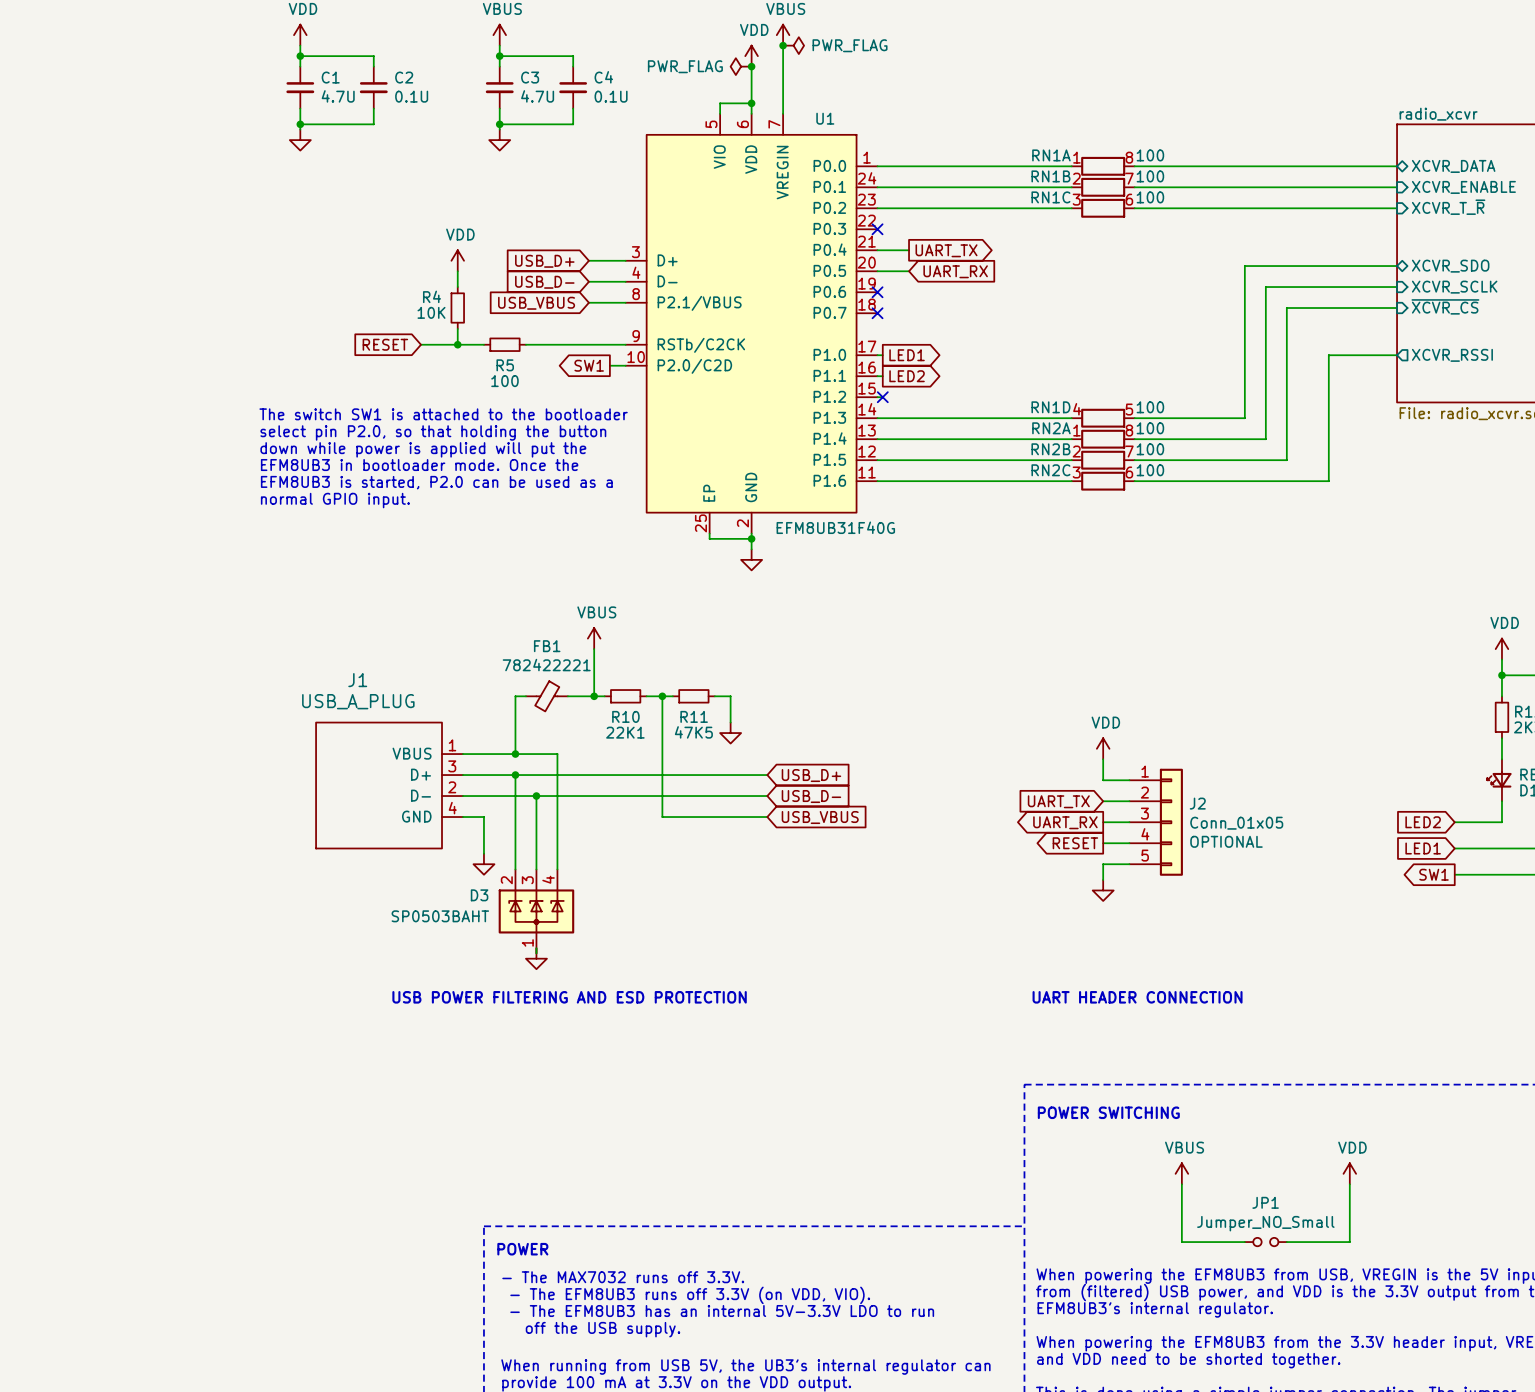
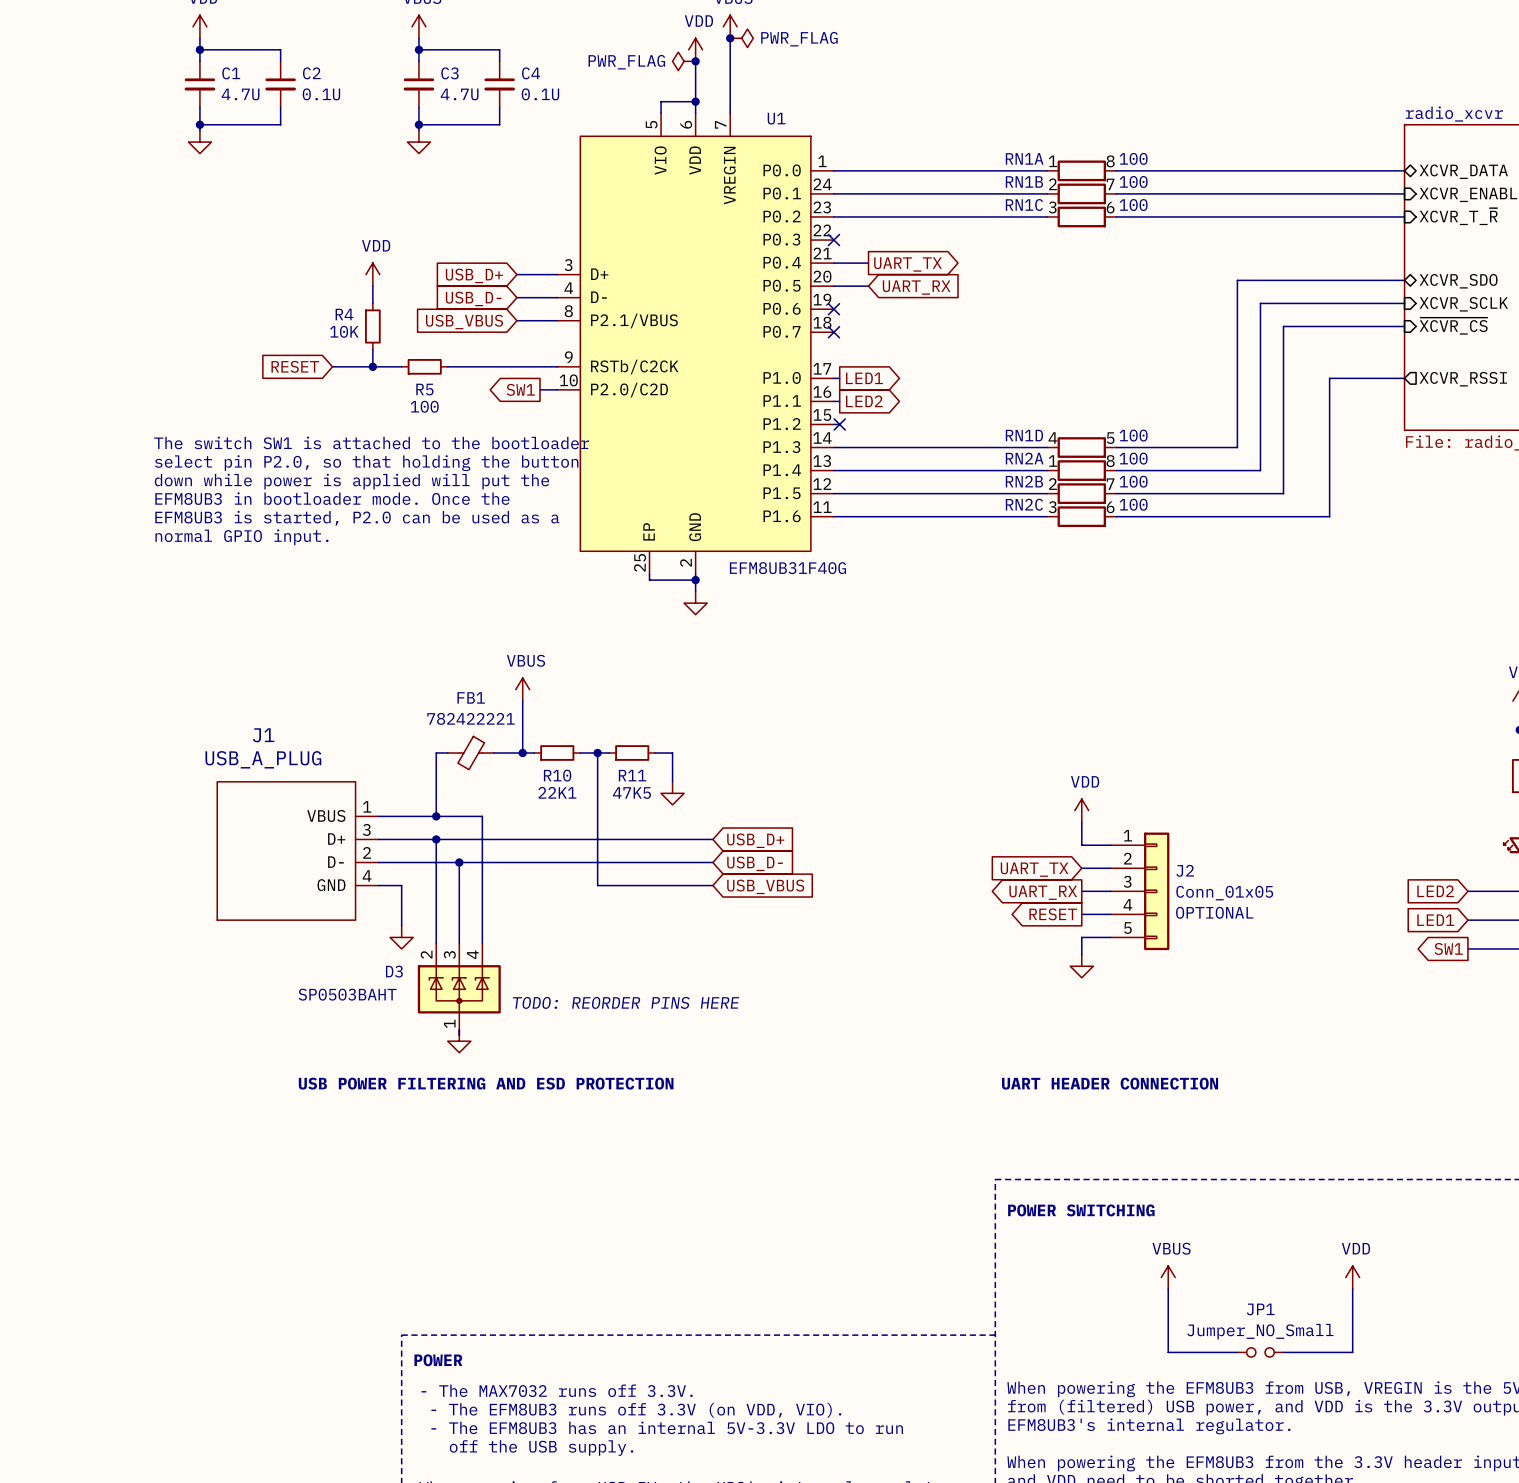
text: none -> TODO: REORDER PINS HERE (626, 1002)

